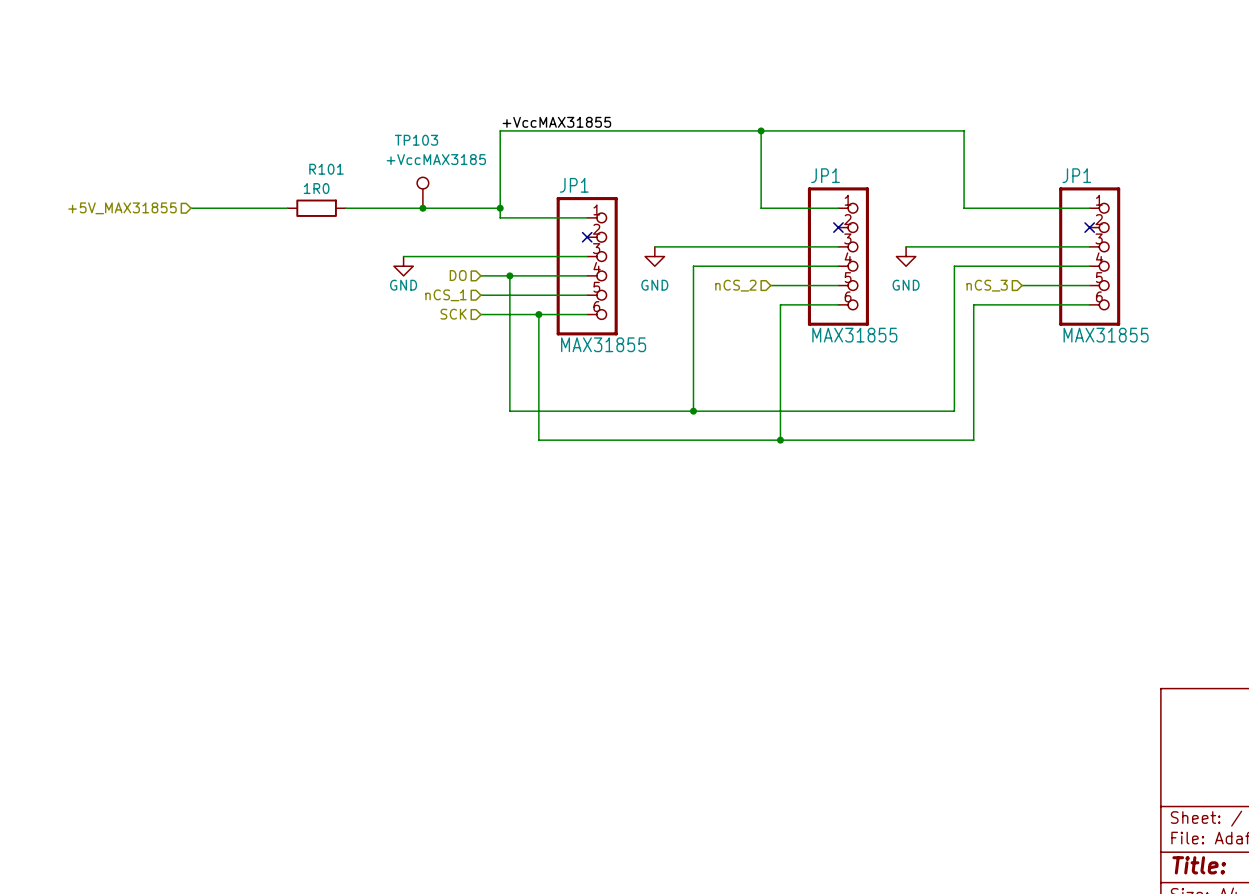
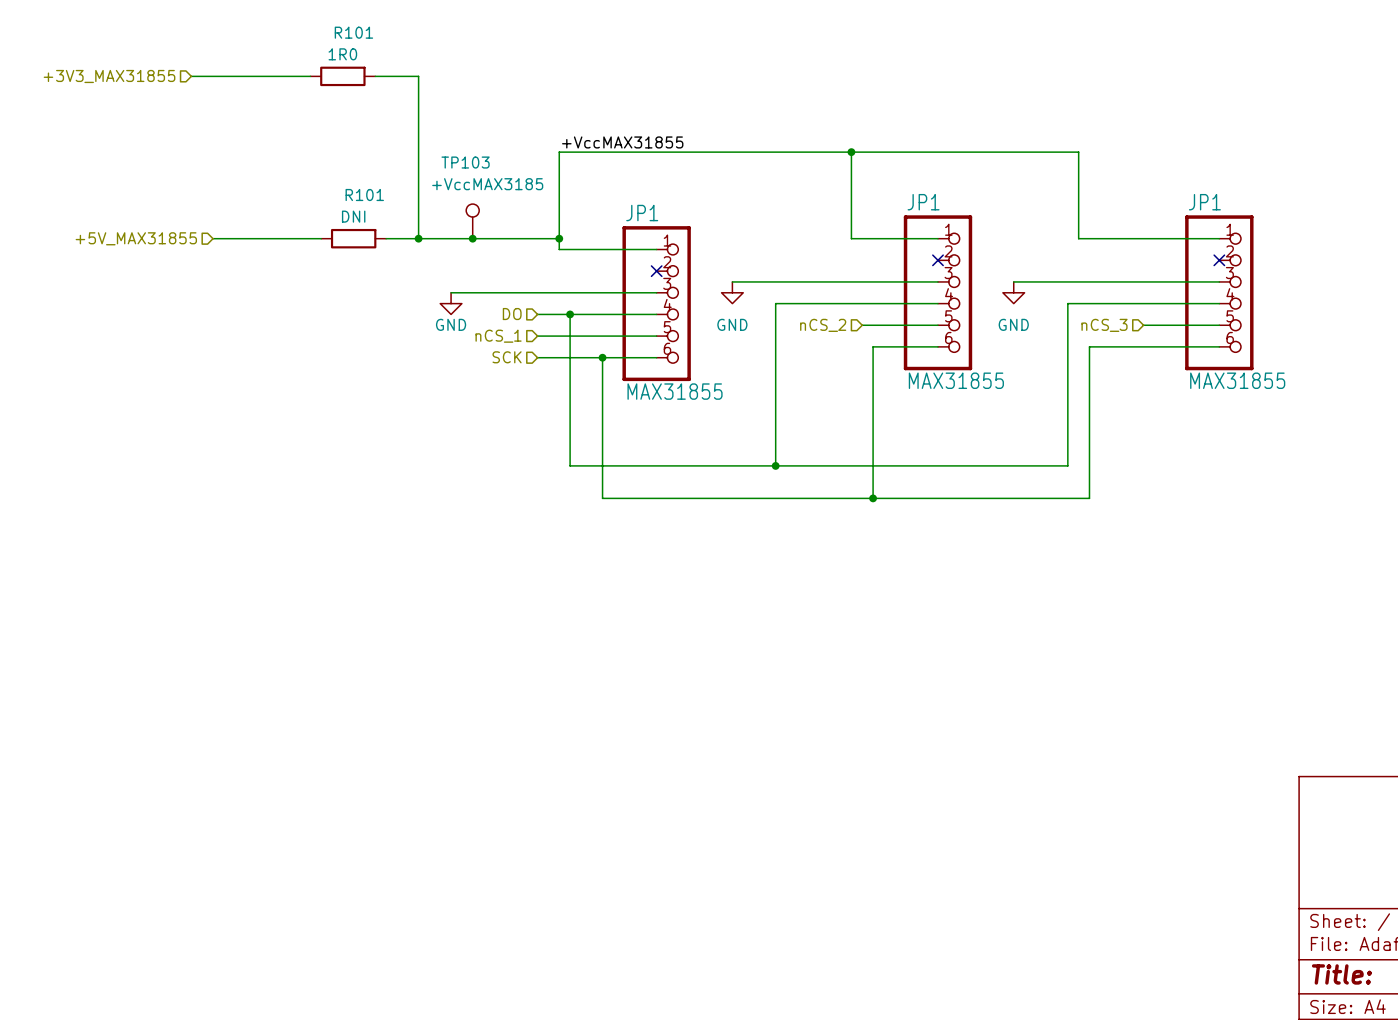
hierarchical label: none -> +3V3_MAX31855 (109, 76)
wire: none -> (191, 76) (310, 76)
R101: none -> 1R0 (342, 76)
wire: none -> (375, 76) (418, 76) (418, 238)
R101 value: 1R0 (316, 188) -> DNI (353, 216)
junction: none -> (418, 238)

